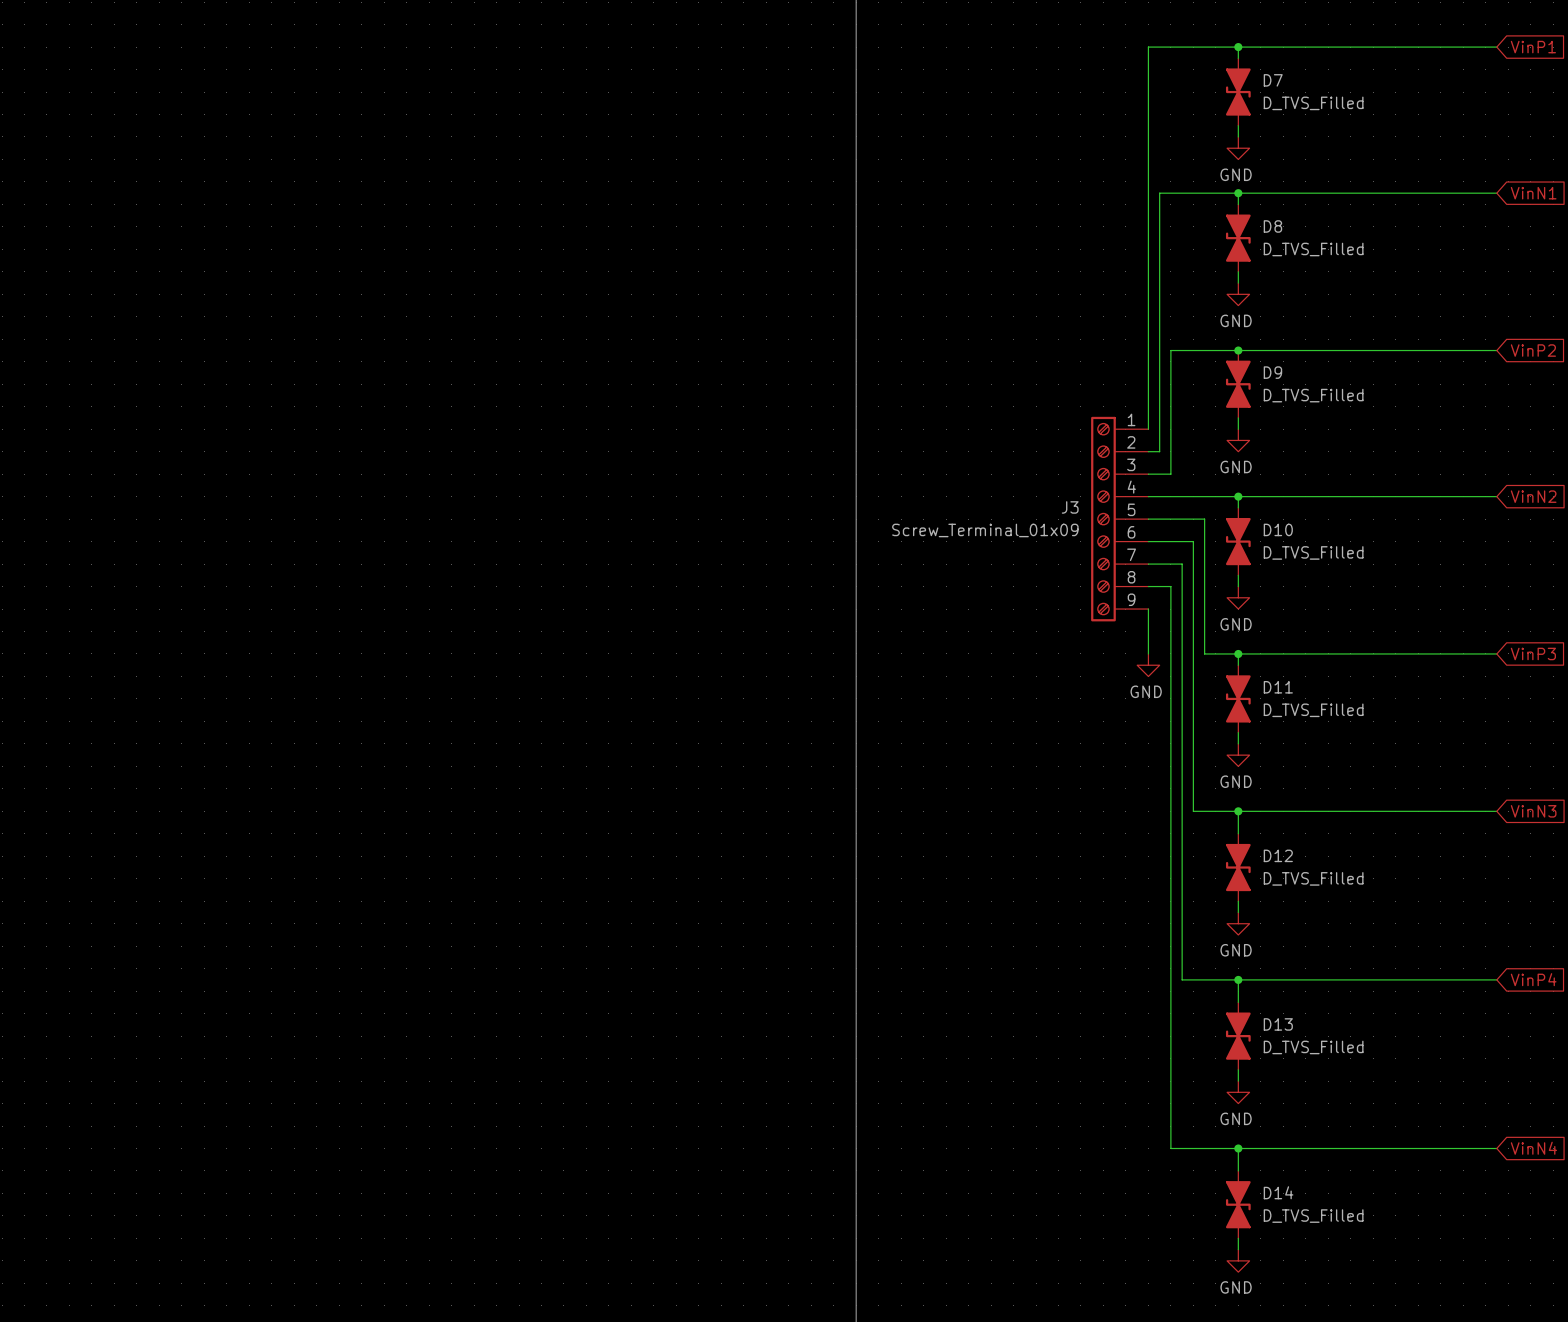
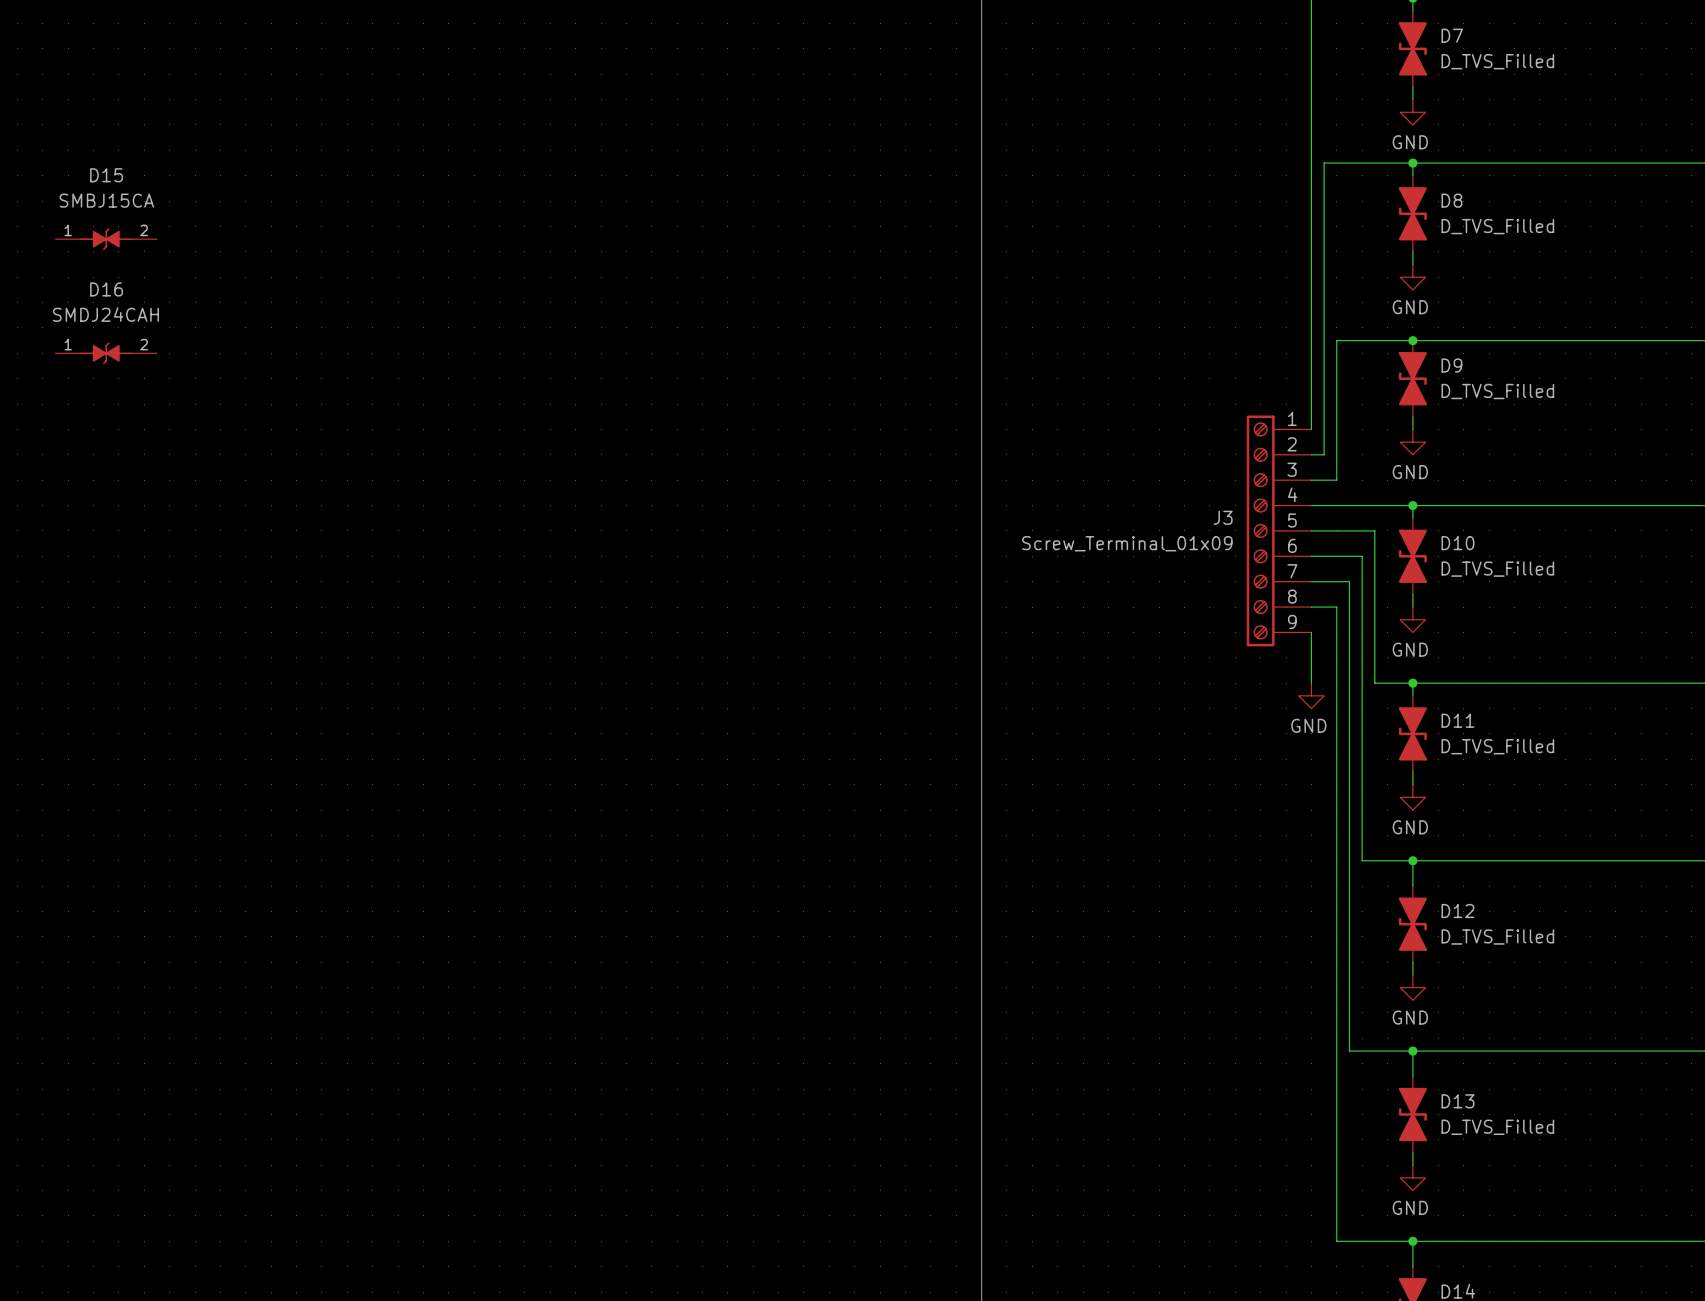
D15: none -> SMBJ15CA (106, 239)
D16: none -> SMDJ24CAH (106, 353)

